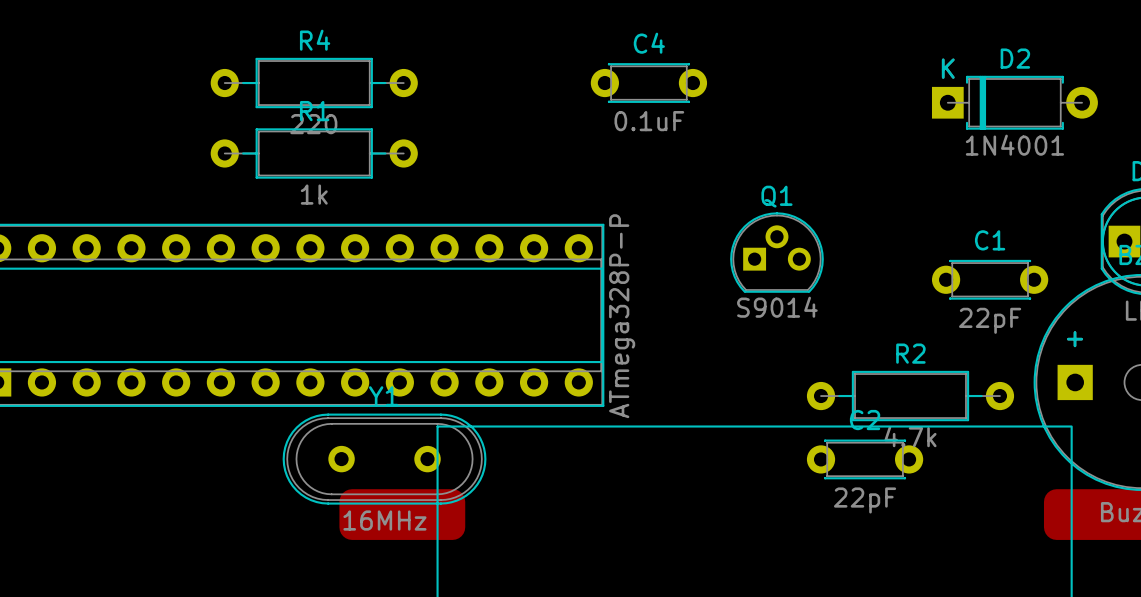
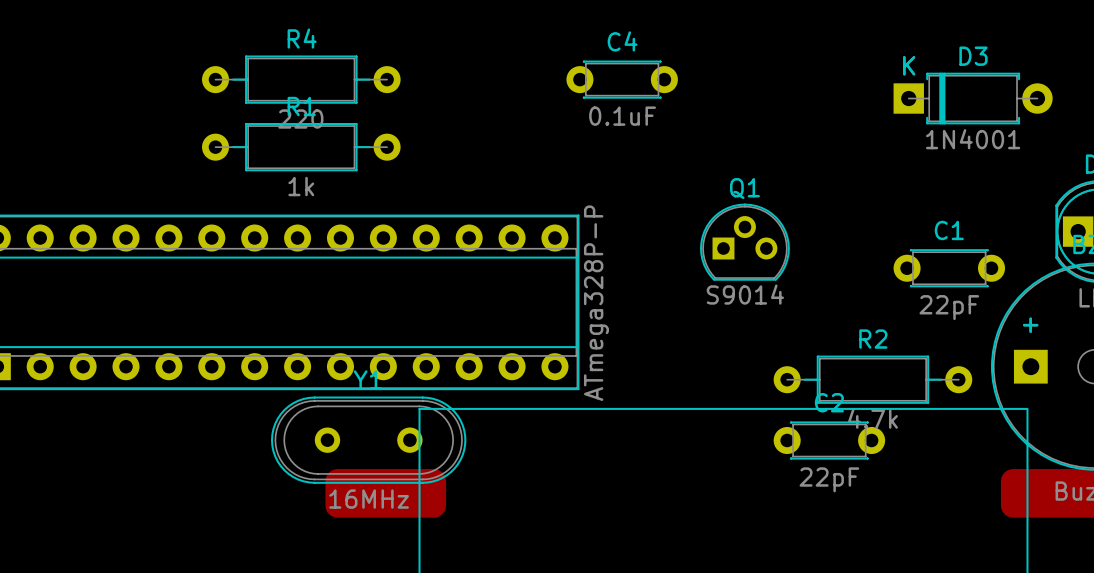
D2 name: D2 (1015, 58) -> D3 (973, 56)

